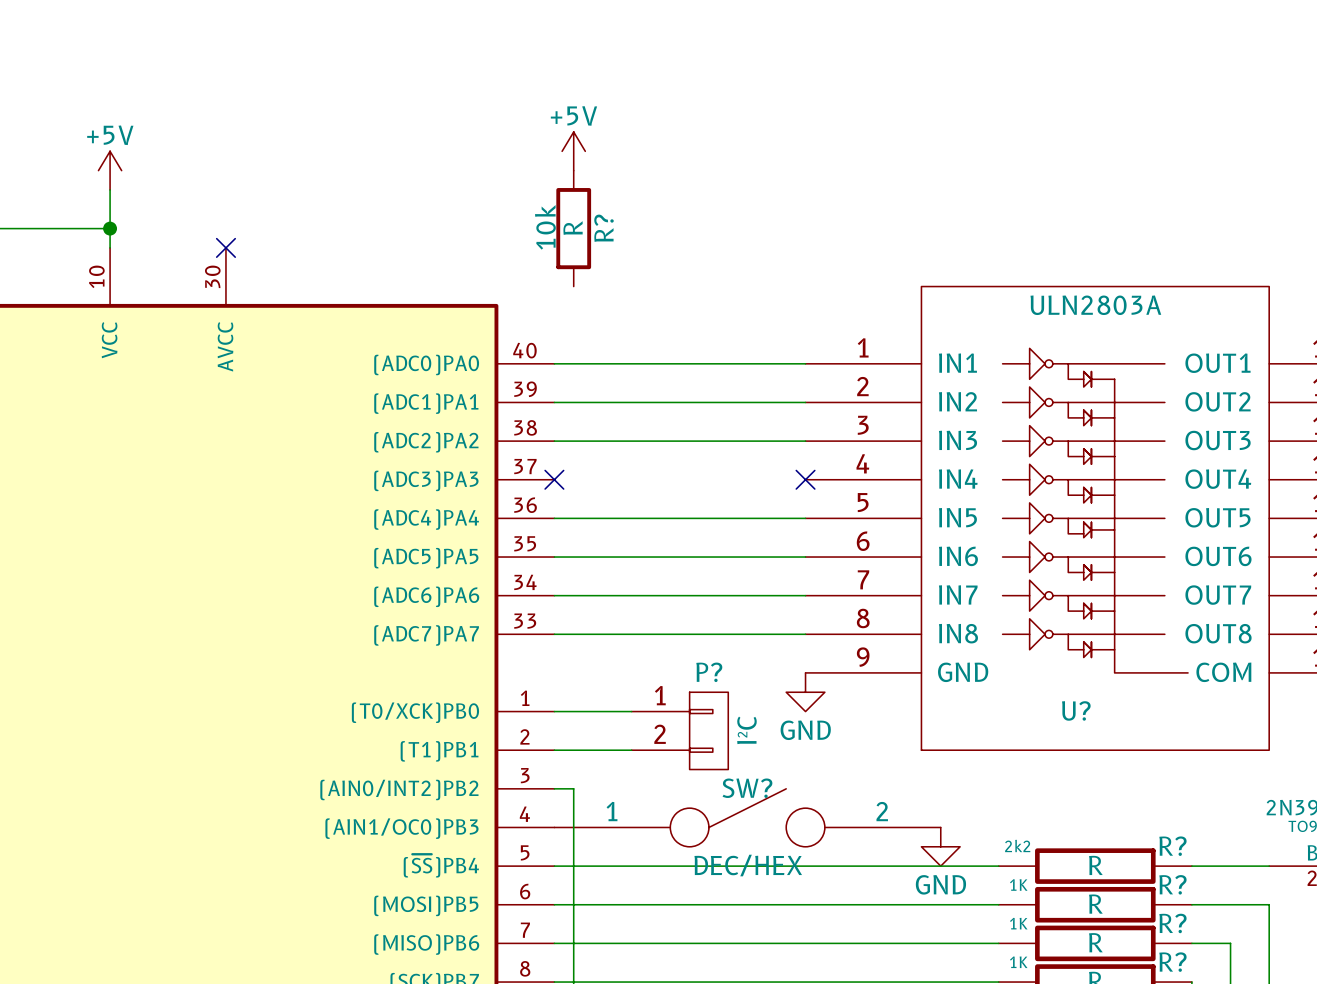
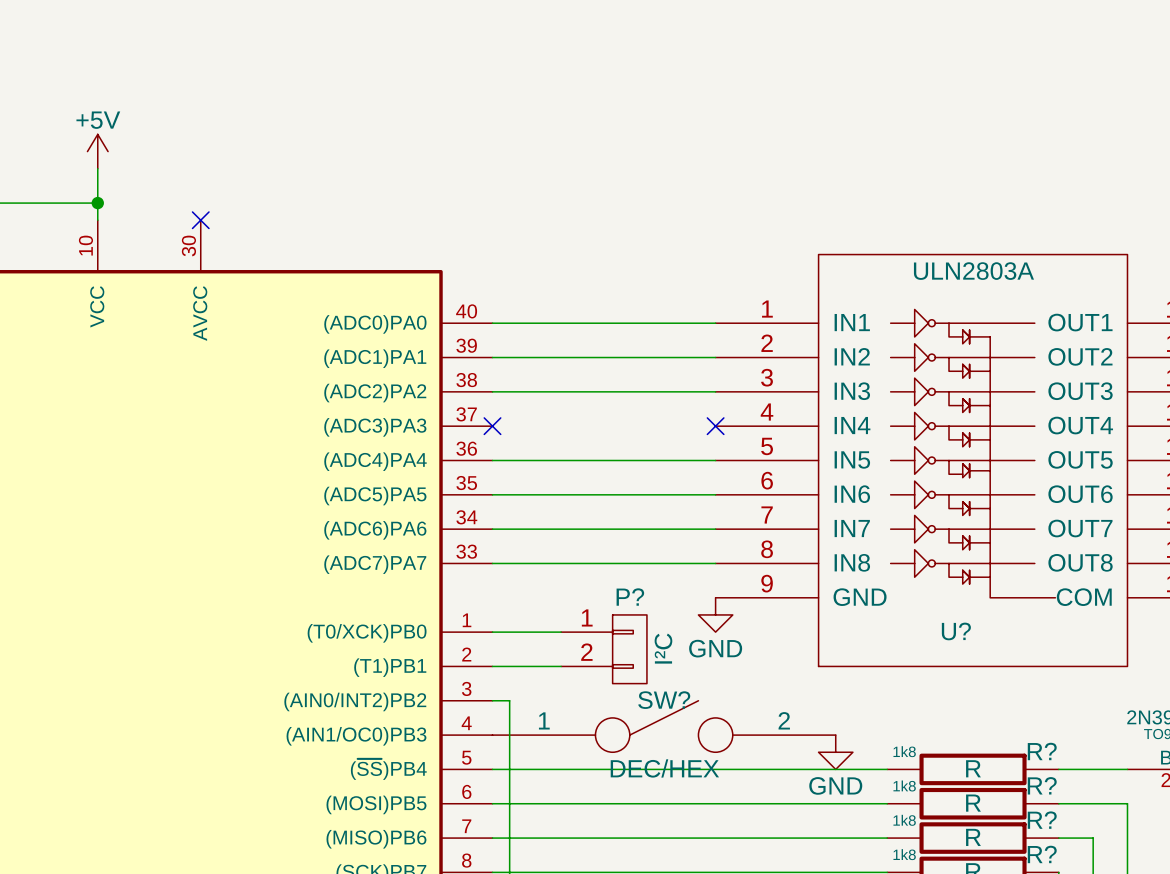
power symbol: +5V (573, 151) -> none
R?: R (573, 228) -> none
R? text: 2k2 (1017, 845) -> 1k8 (904, 751)
R? text: 1K (1018, 885) -> 1k8 (904, 785)
R? text: 1K (1018, 923) -> 1k8 (904, 820)
R? text: 1K (1018, 962) -> 1k8 (904, 854)

